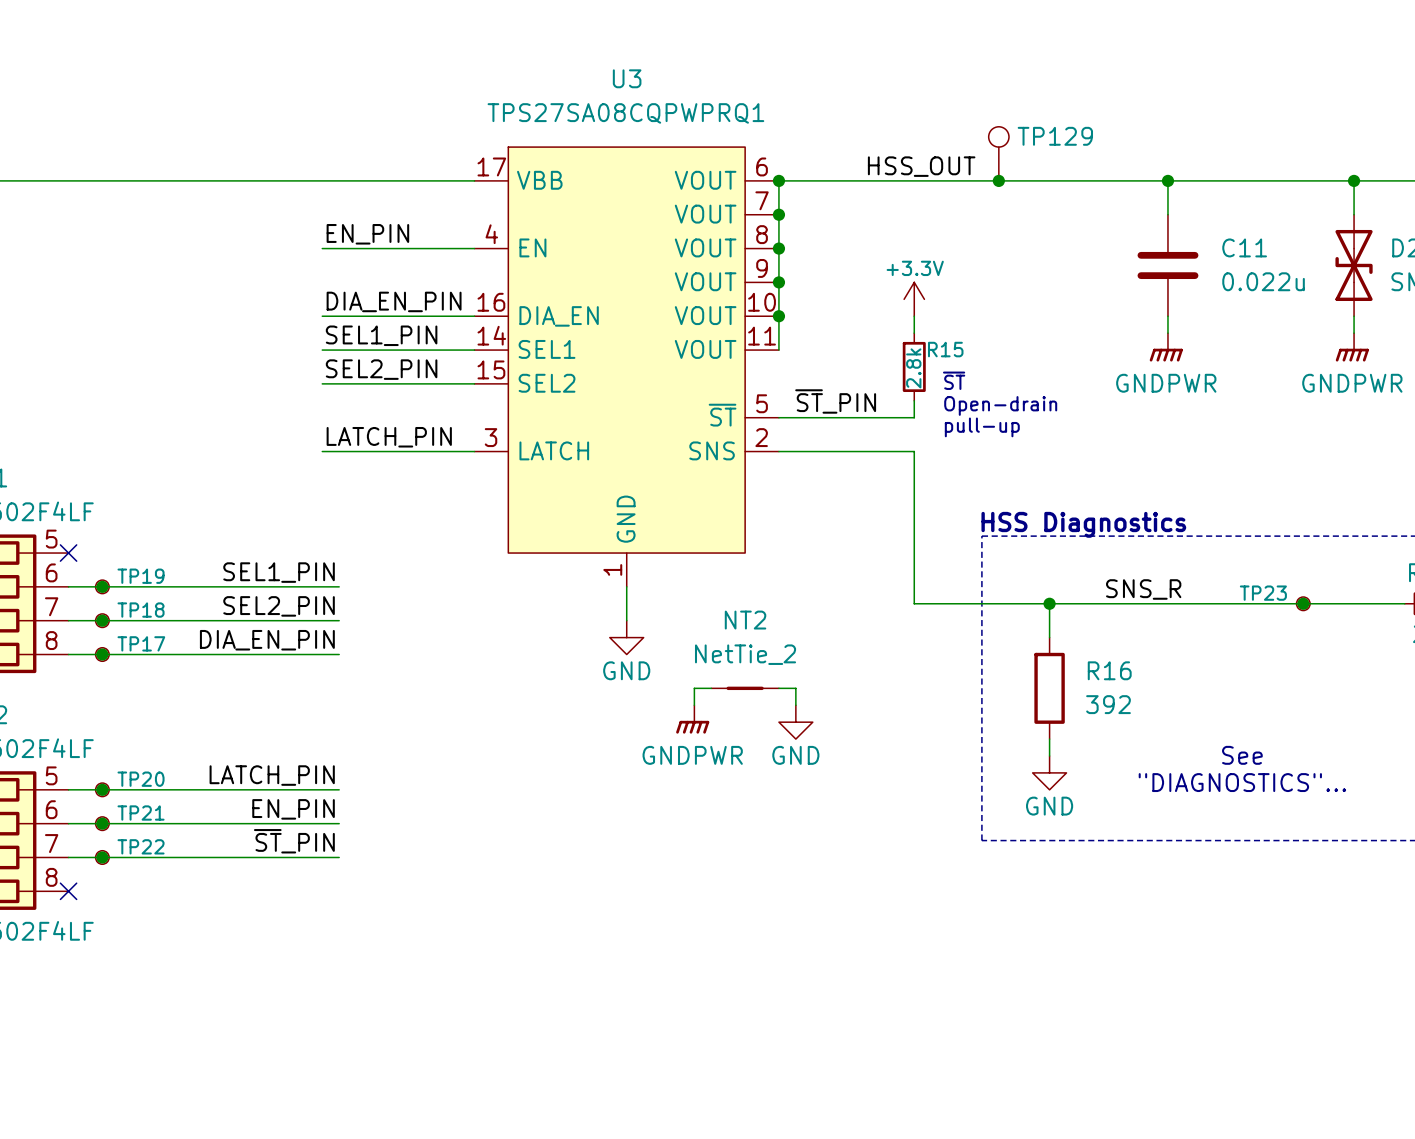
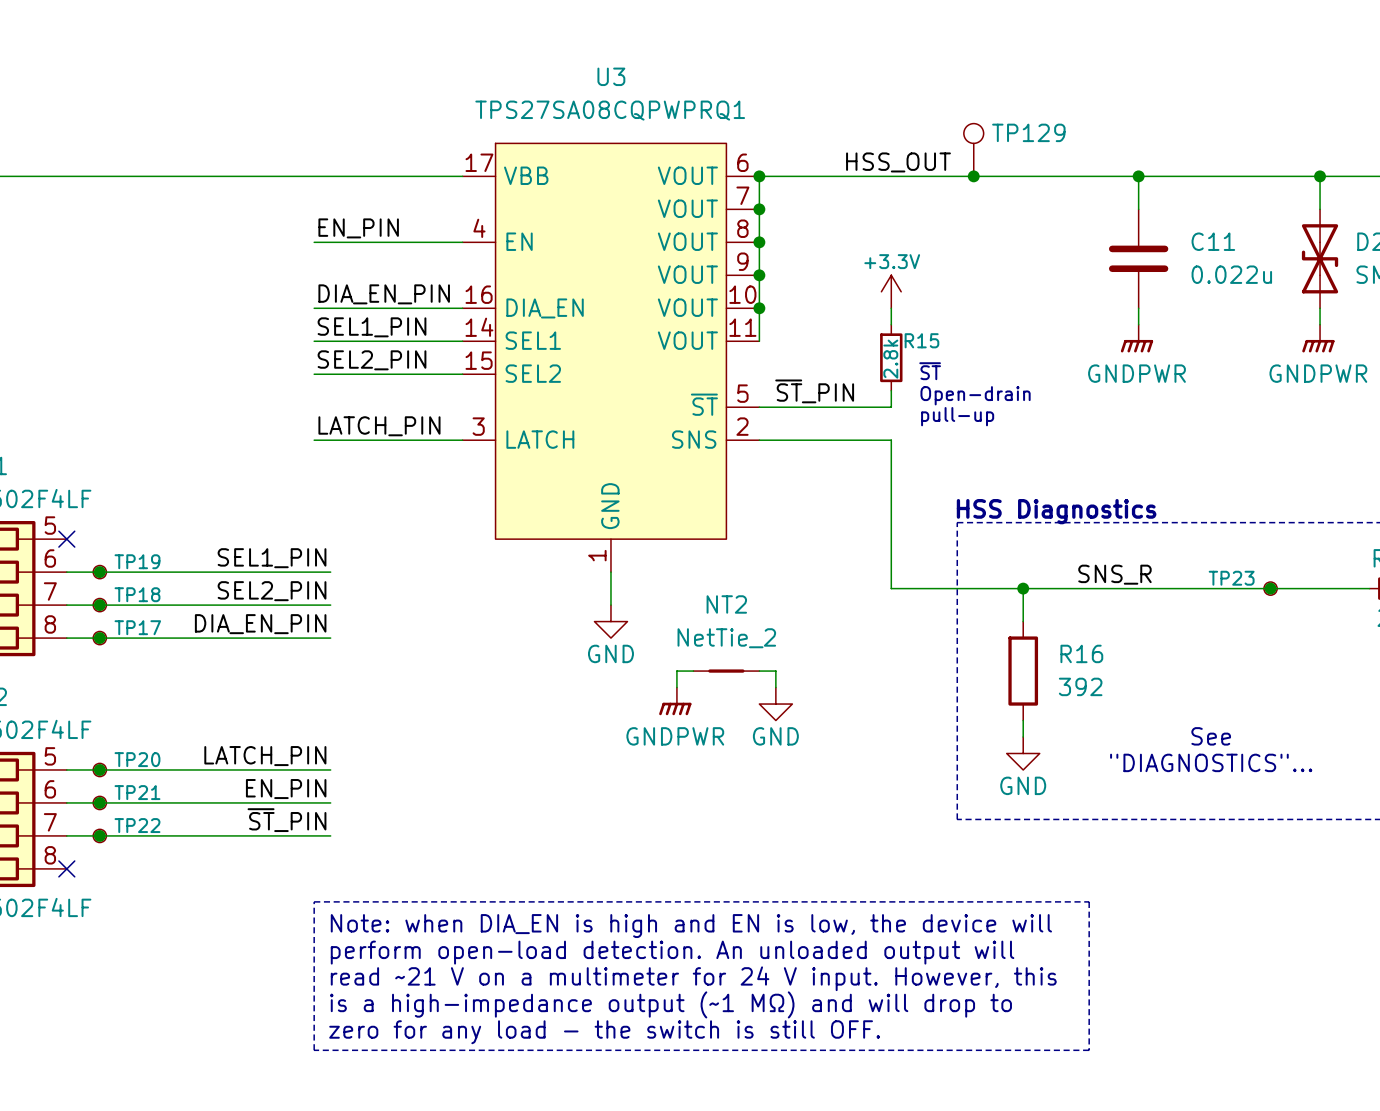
line: none -> (314, 901) (1089, 901) (1089, 1050) (314, 1050) (314, 901)
text: none -> Note: when DIA_EN is high and EN is low, the device will (691, 926)
text: none -> perform open-load detection. An unloaded output will (672, 952)
text: none -> read ~21 V on a multimeter for 24 V input. However, this (693, 978)
text: none -> is a high-impedance output (~1 MΩ) and will drop to (670, 1004)
text: none -> zero for any load - the switch is still OFF. (604, 1032)

